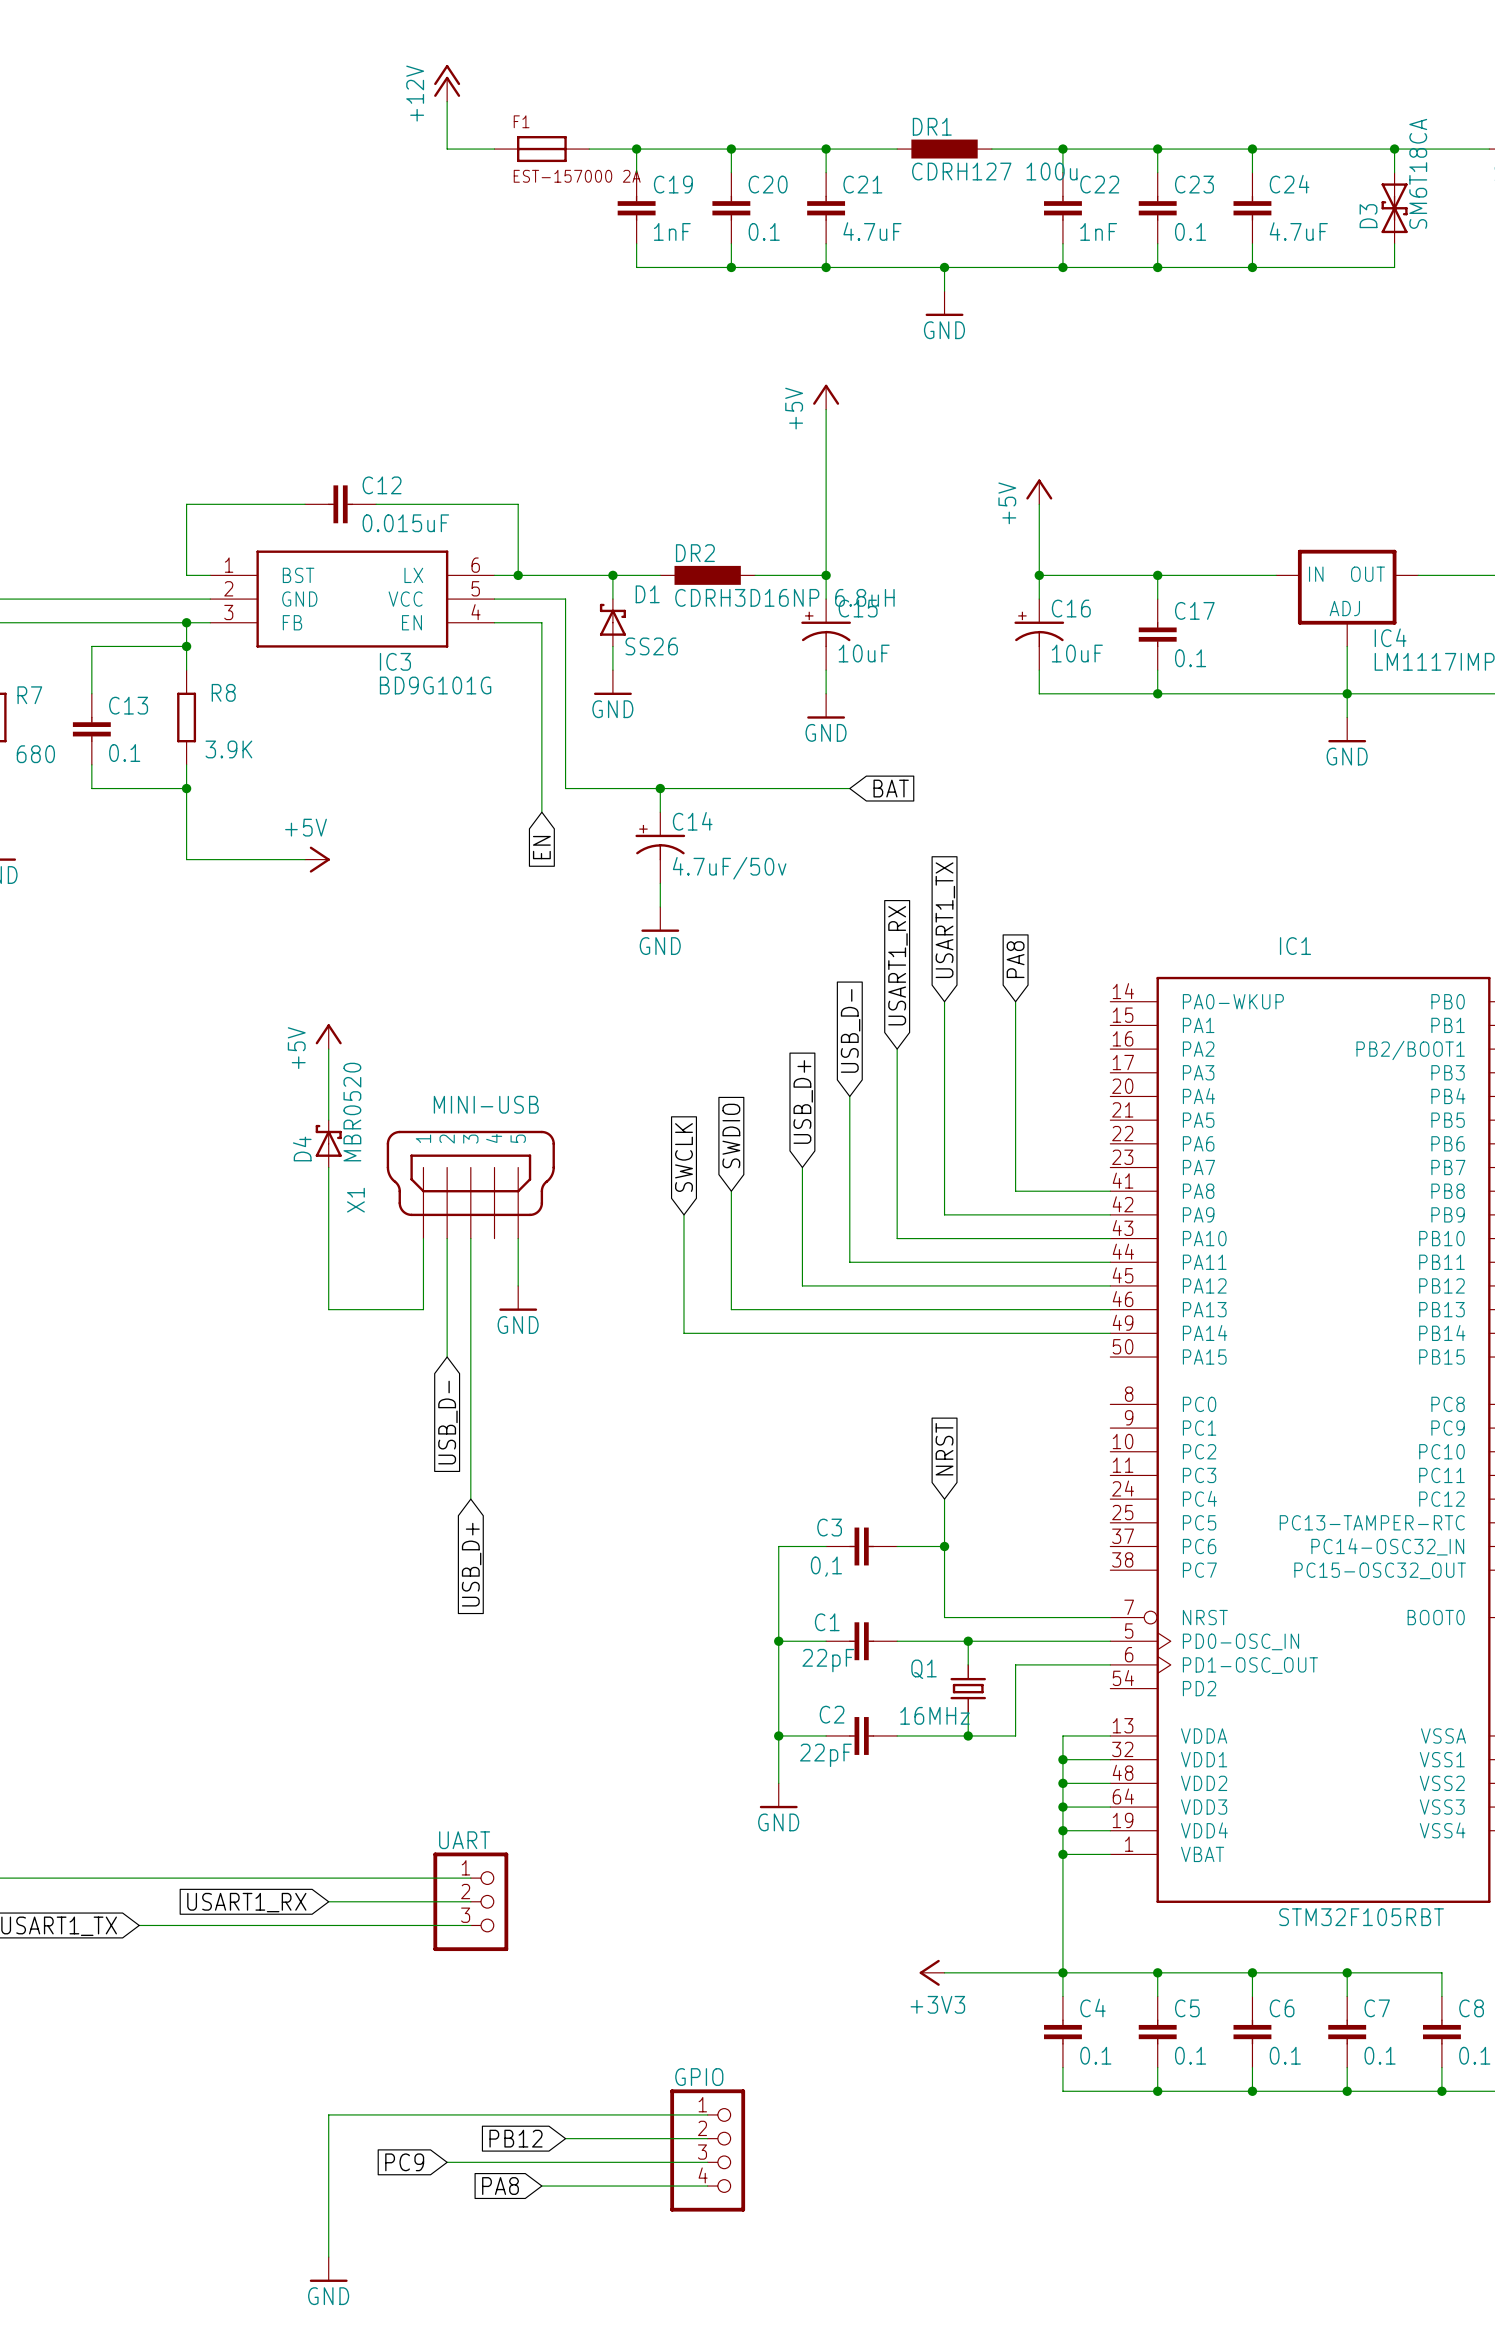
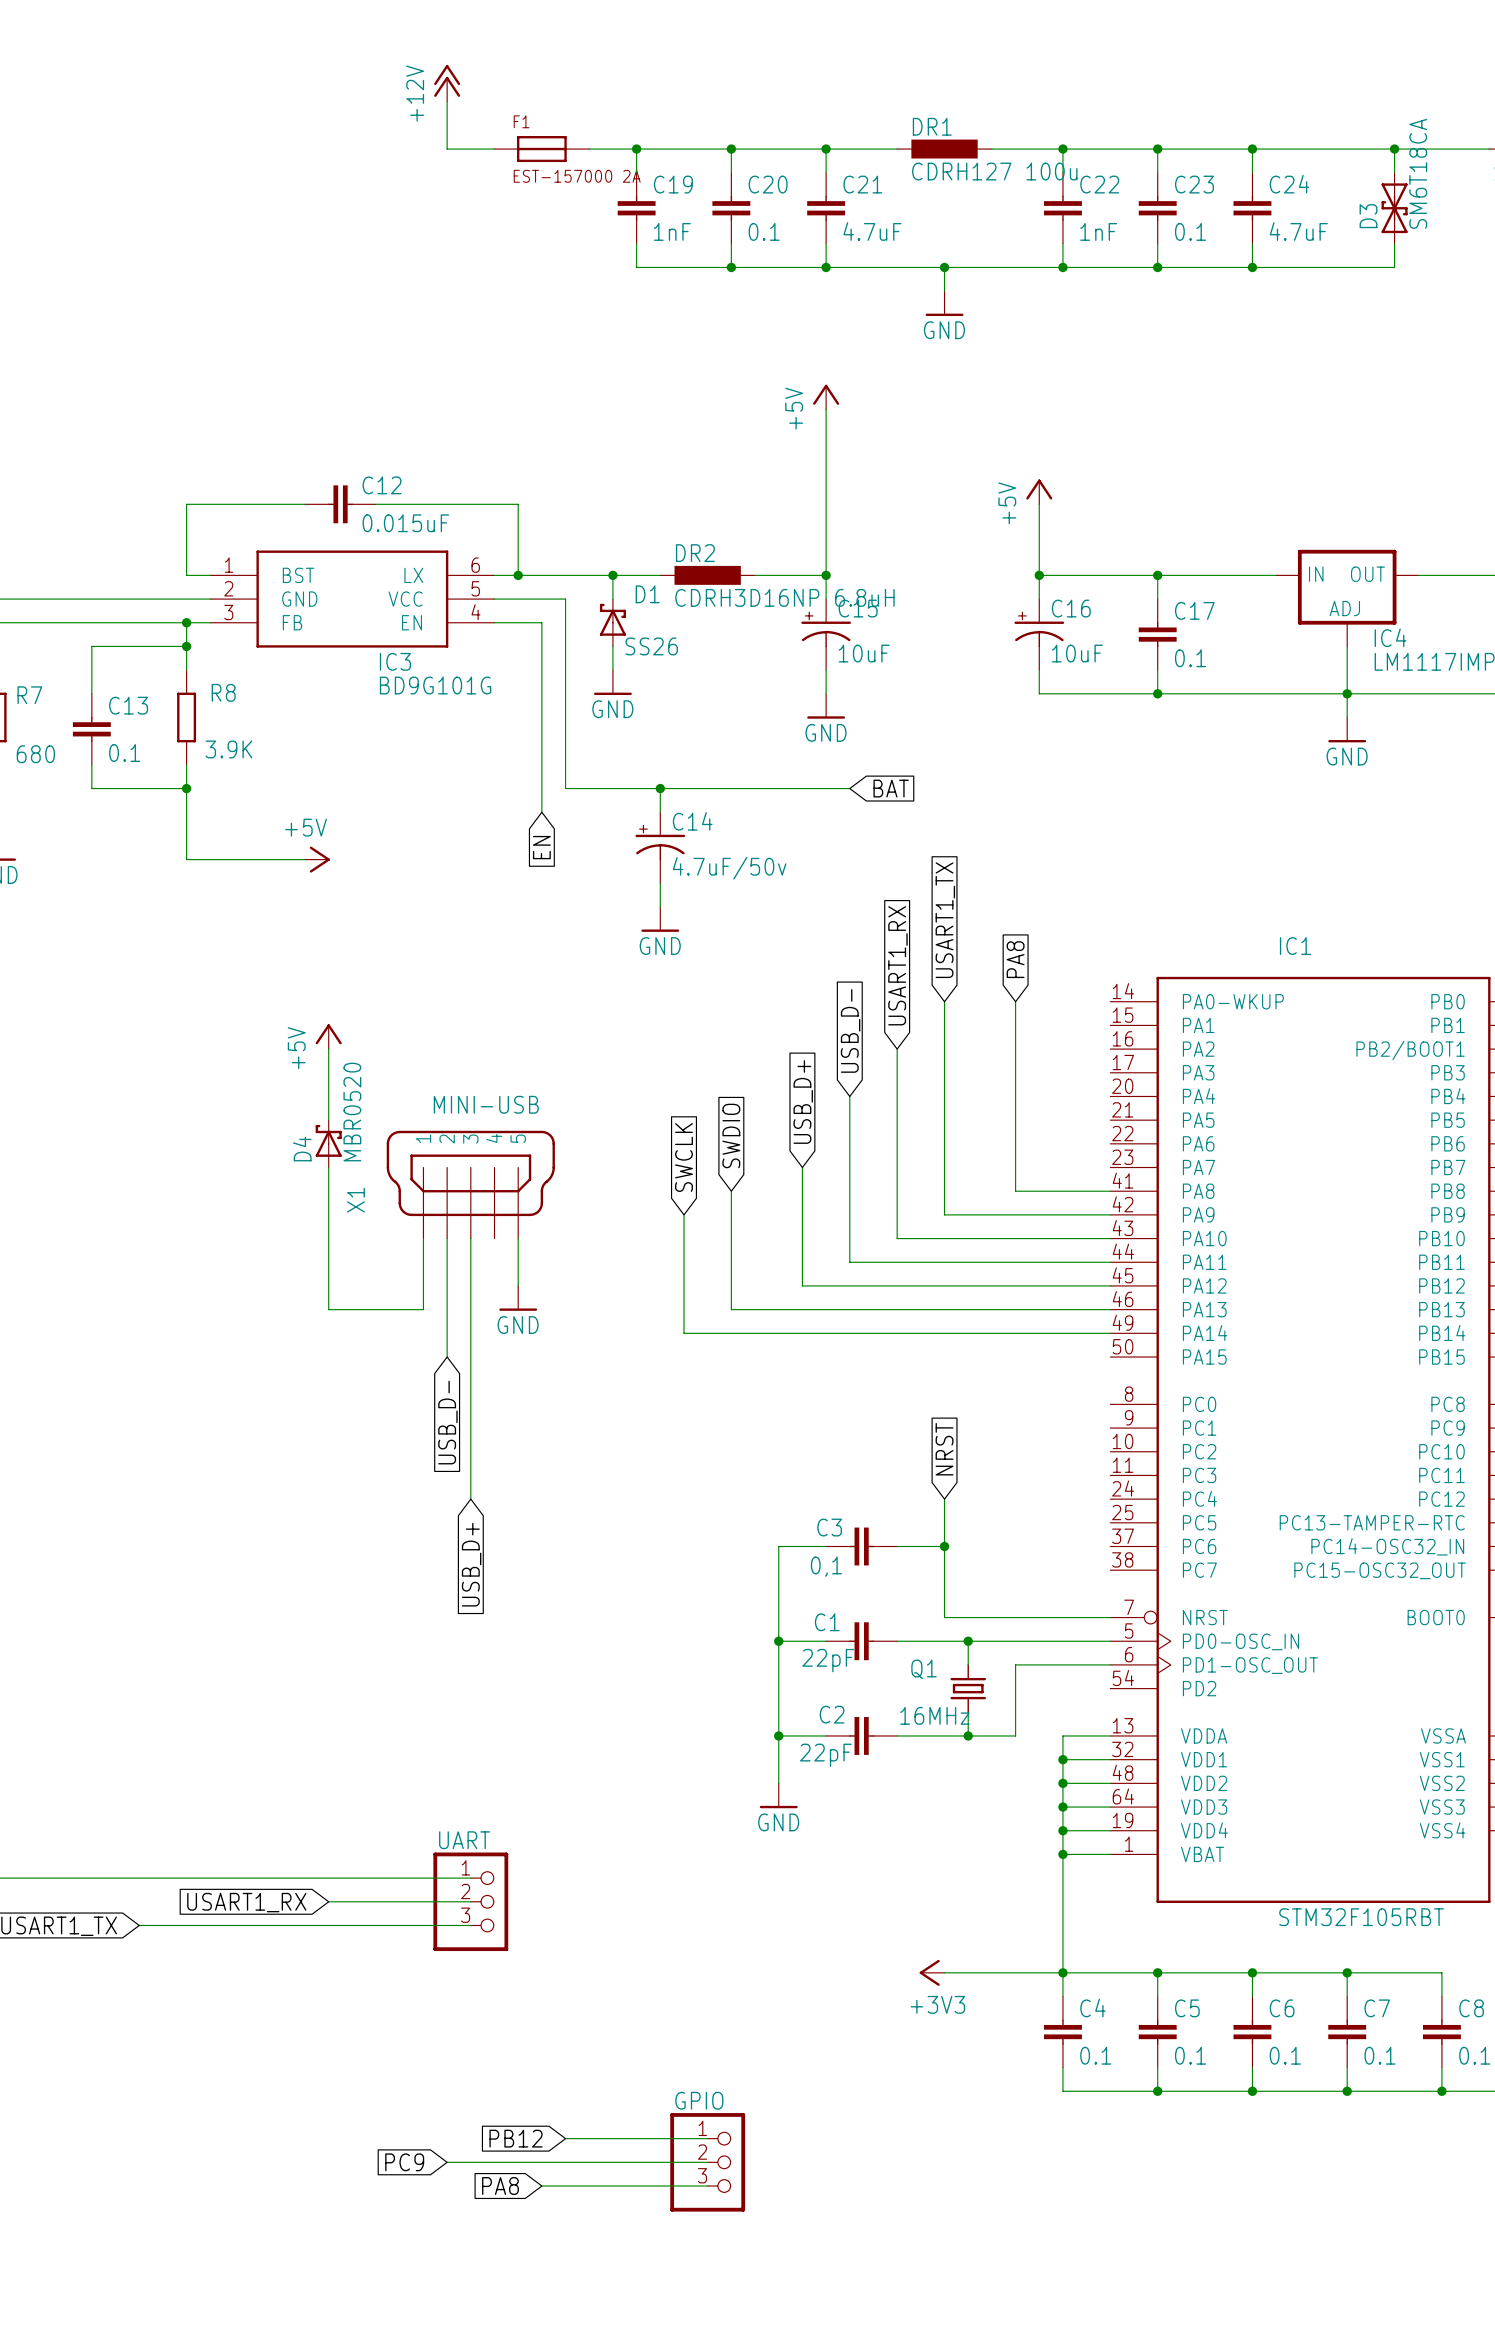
wire: (707, 2114) (328, 2114) (328, 2257) -> none
GPIO: (707, 2150) -> none
GPIO: none -> (707, 2162)
power symbol: GND (328, 2269) -> none

